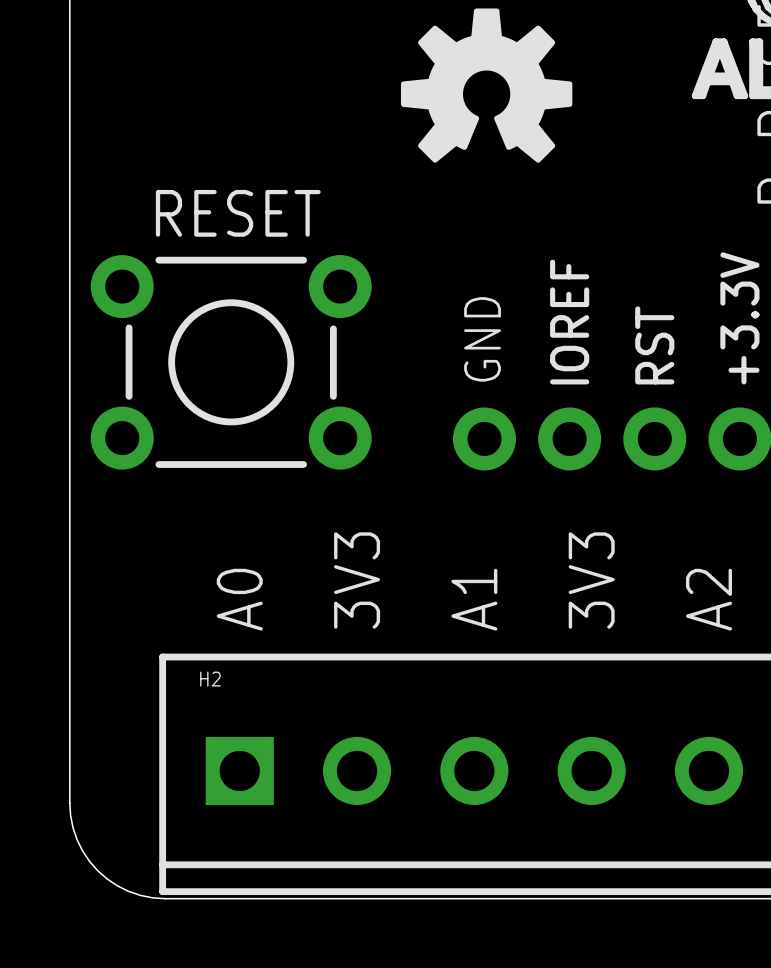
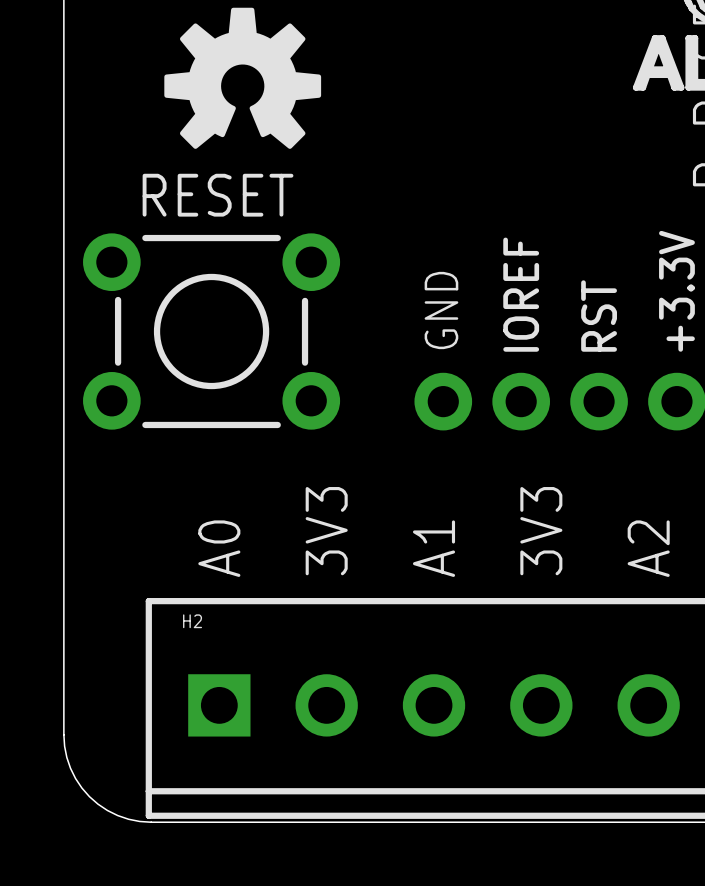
drawing position: (486, 85) -> (242, 78)

